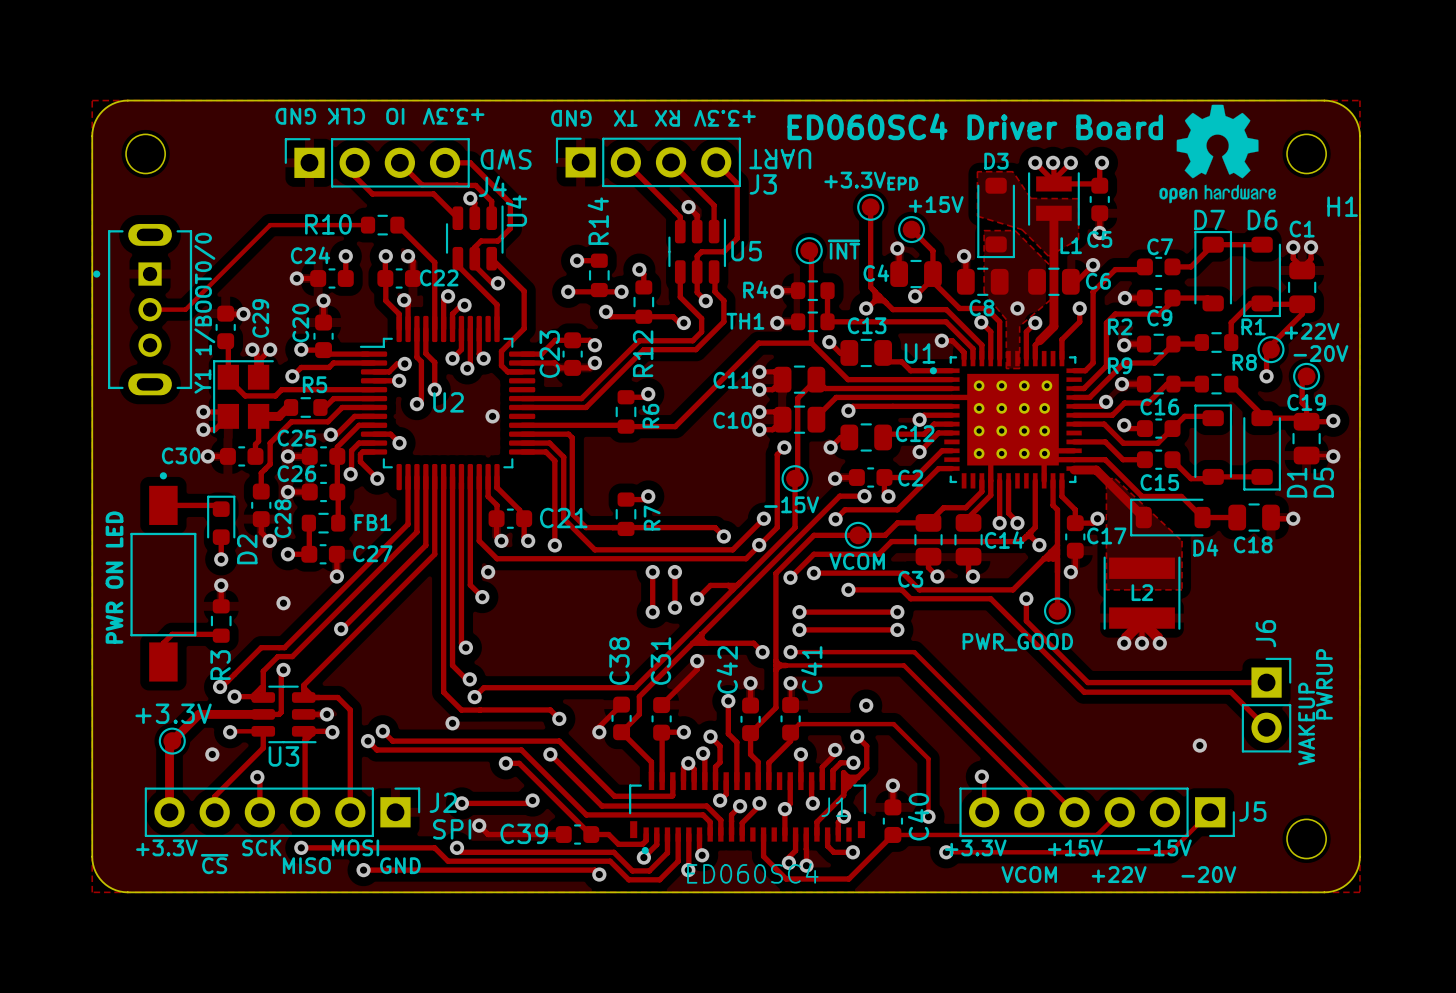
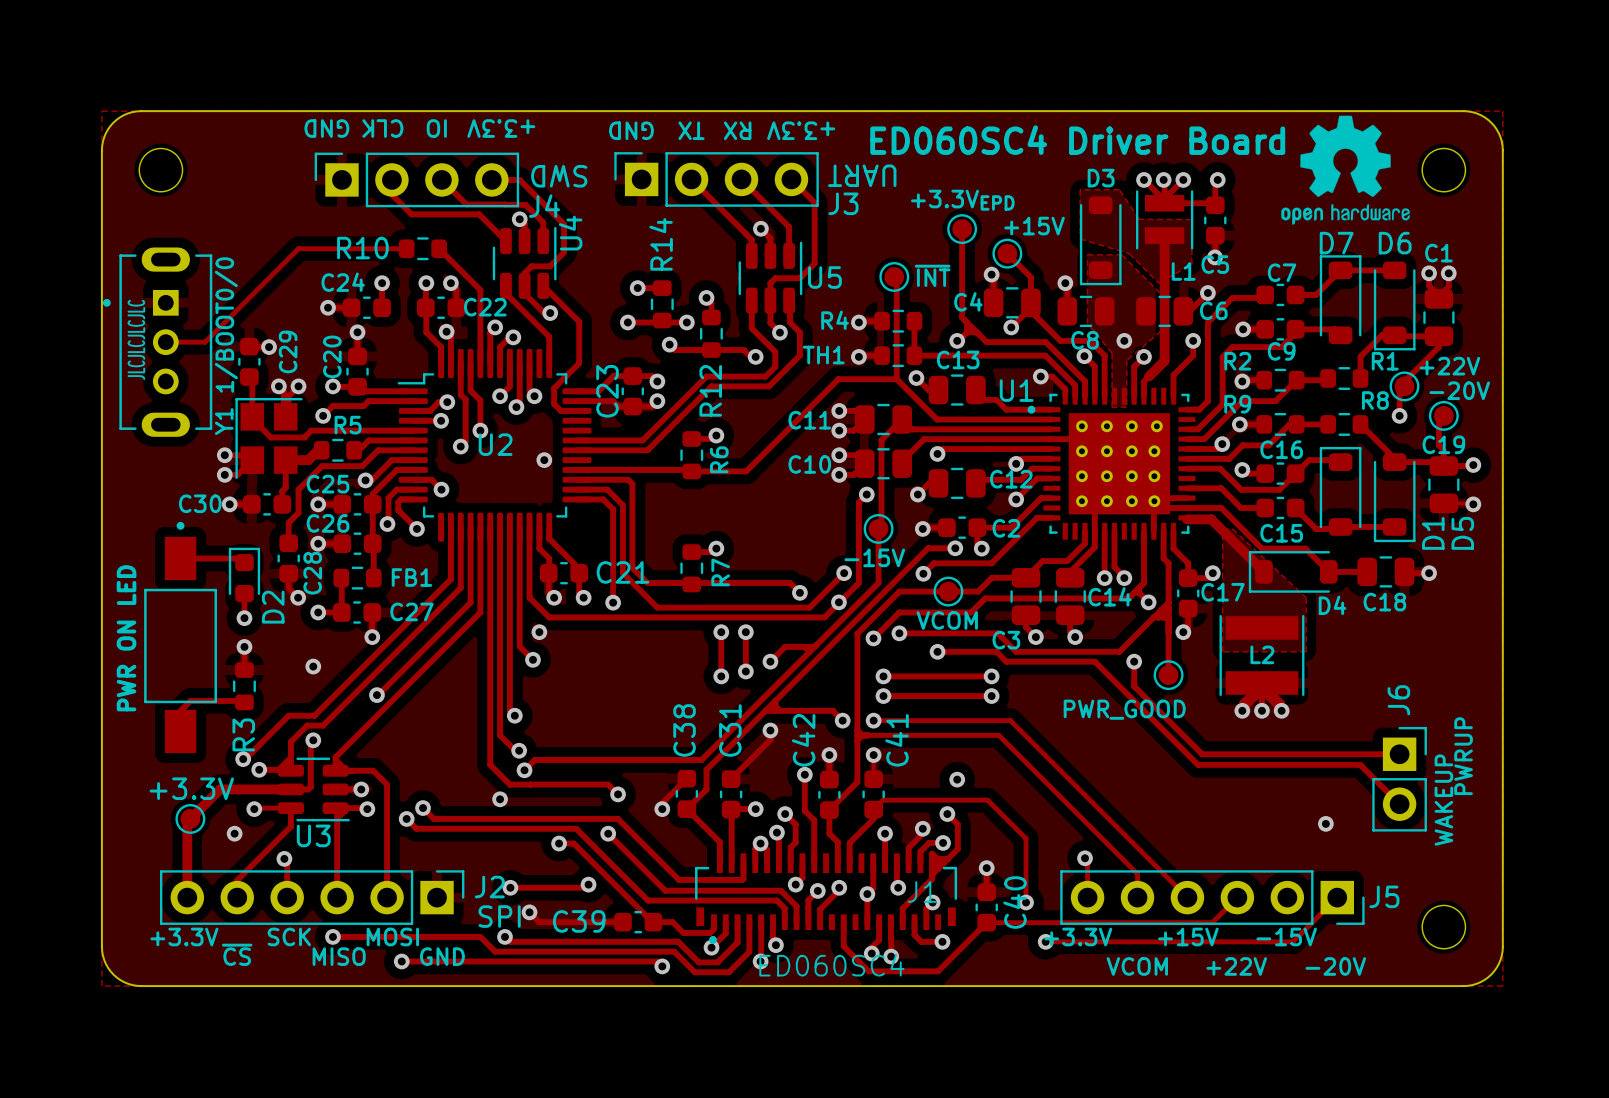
H1 name: H1 (1342, 206) -> none
text: none -> JLCJLCJLCJLC (136, 339)

